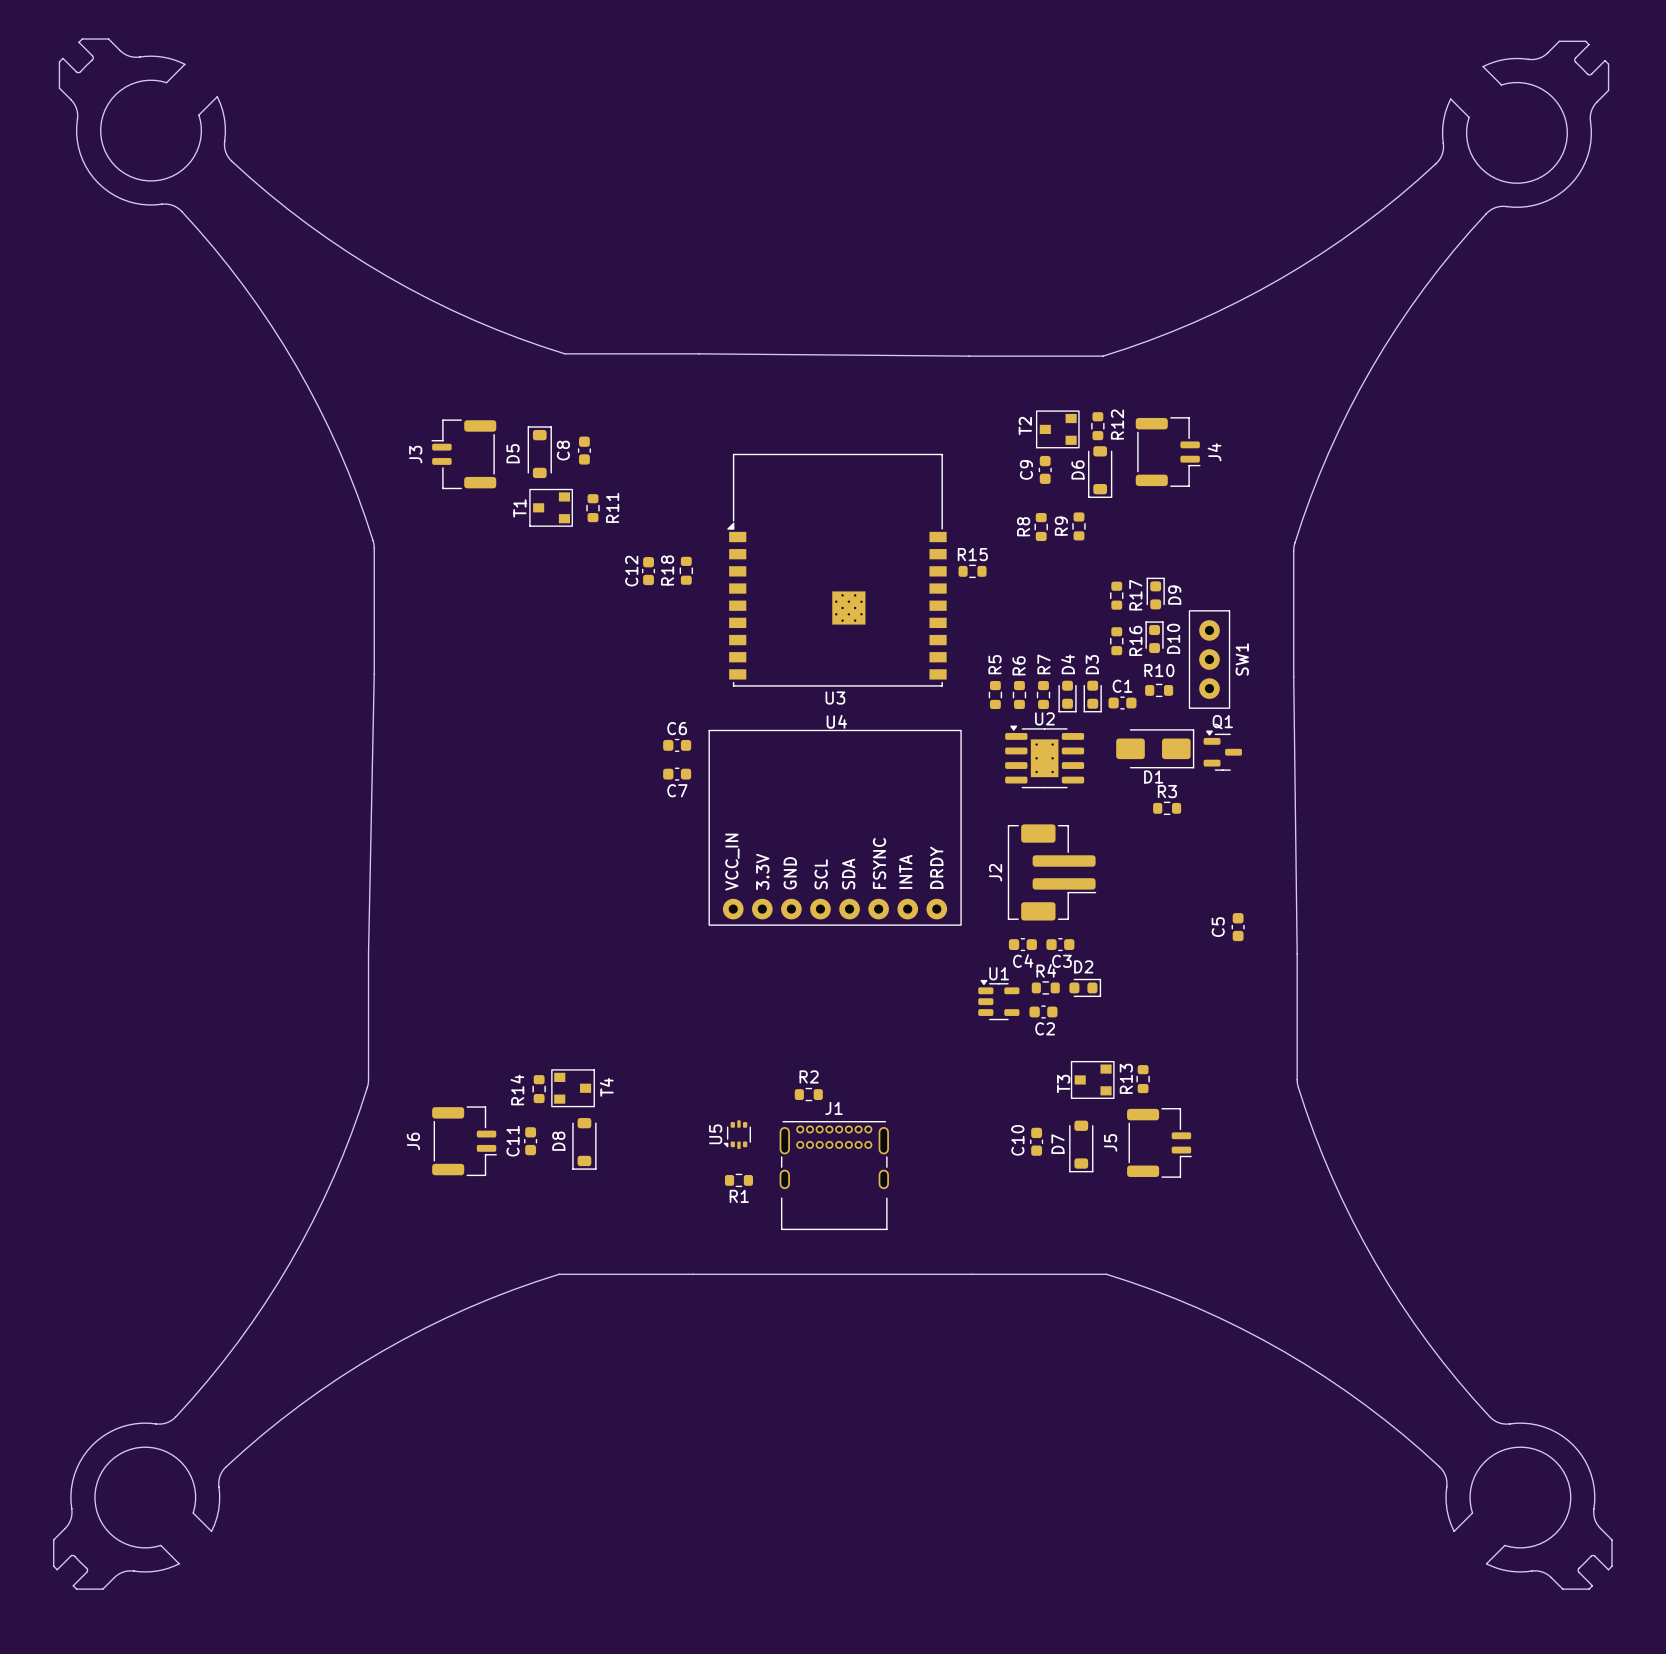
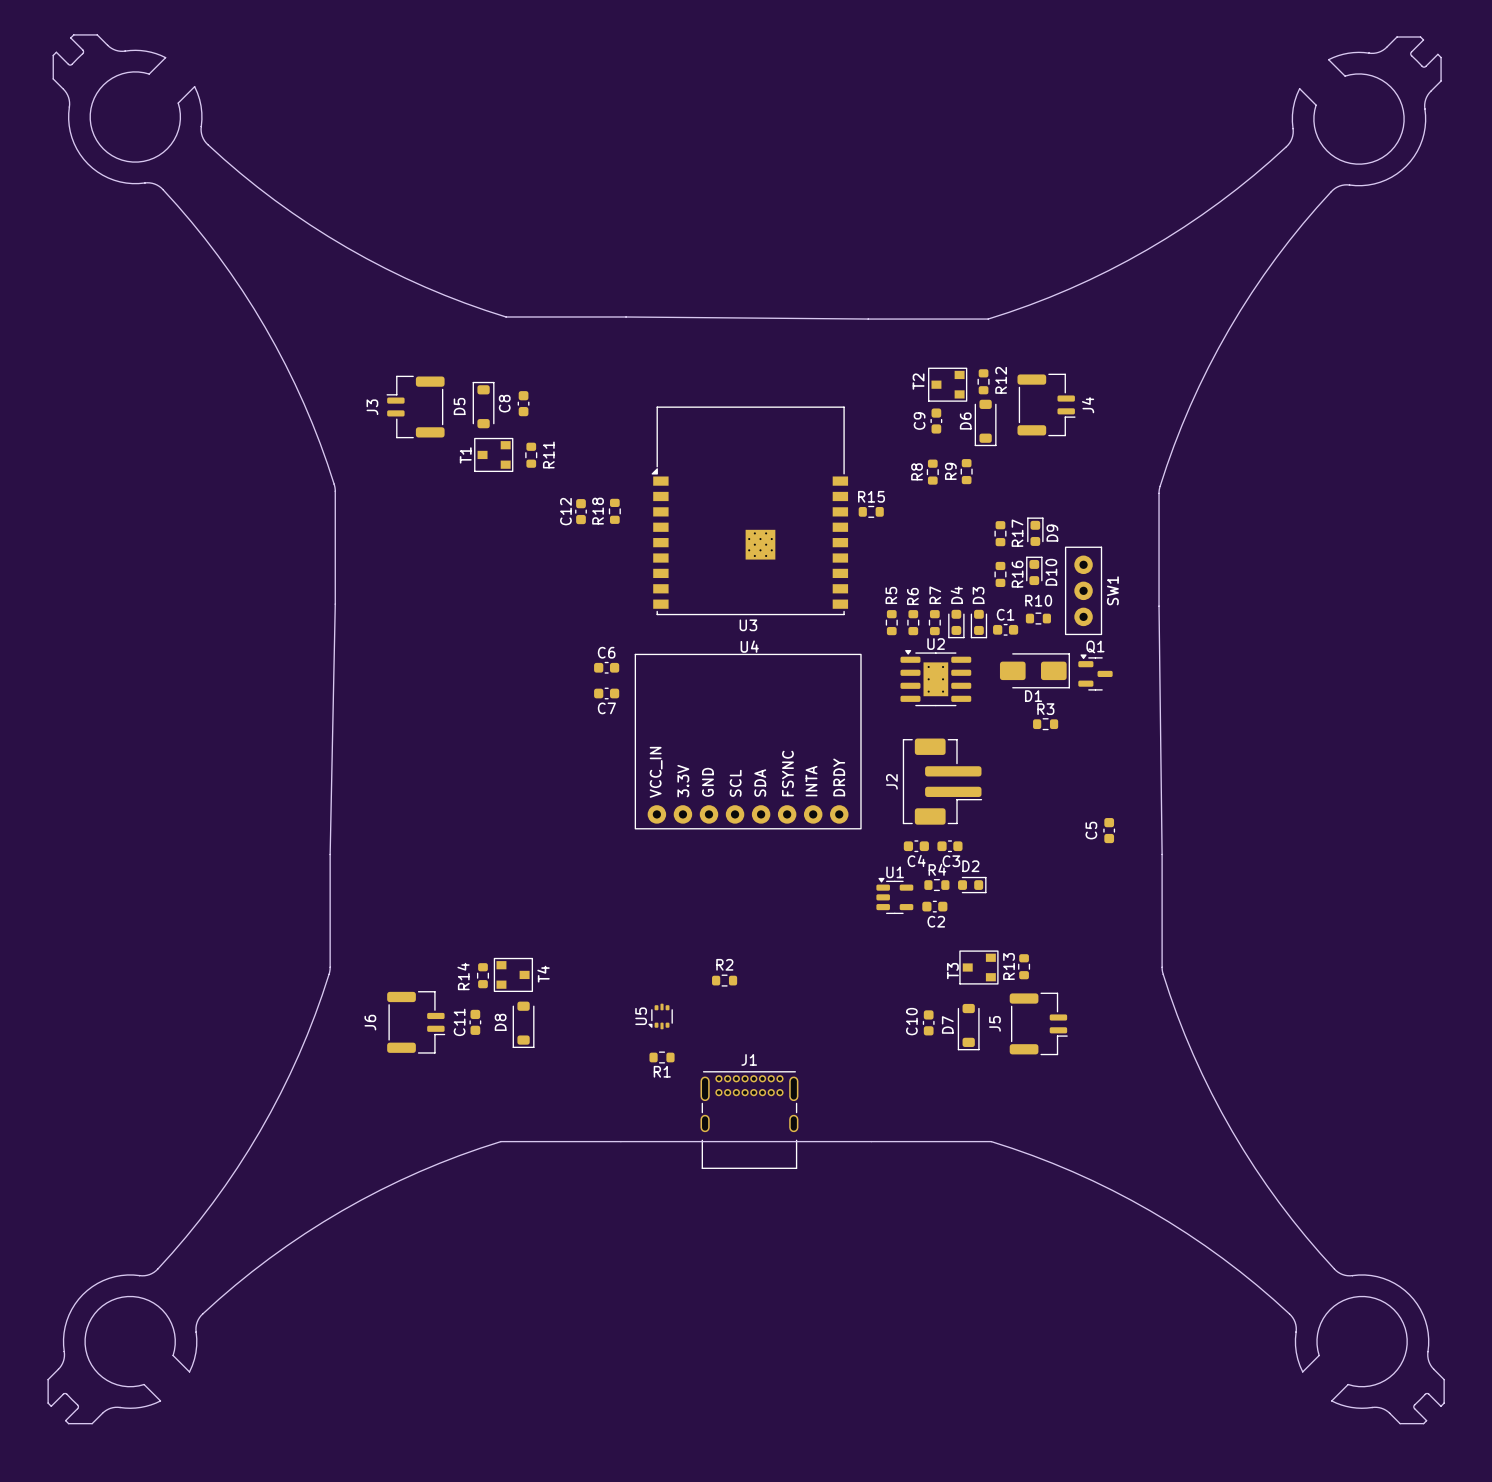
J1 position: (834, 1175) -> (749, 1120)

